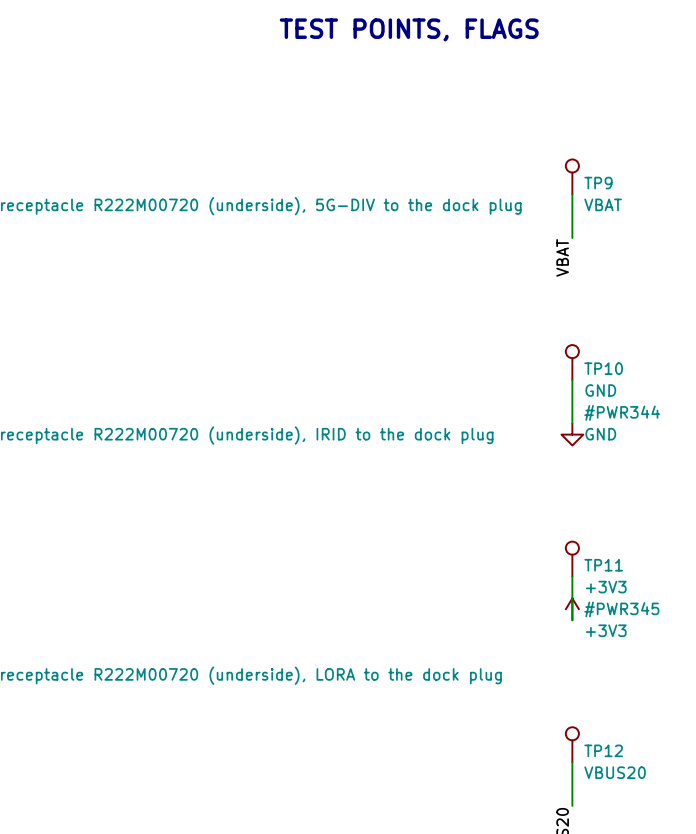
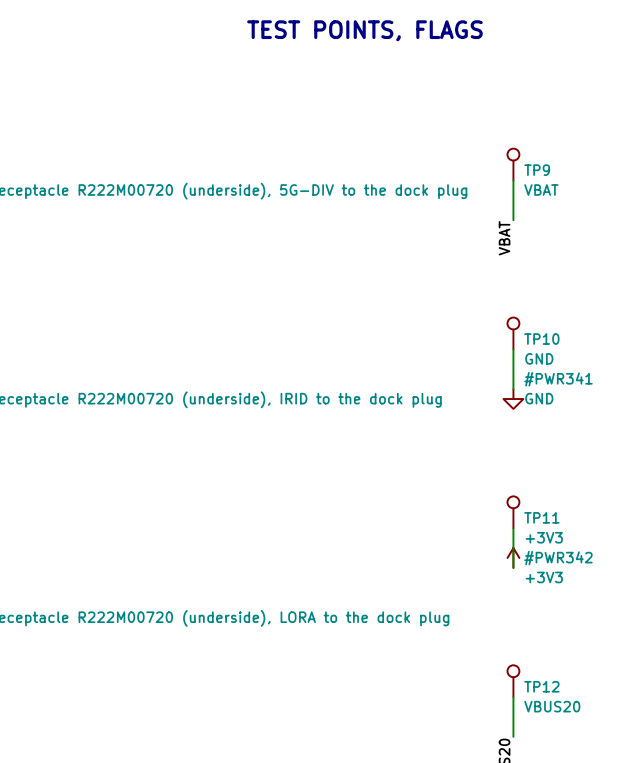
#PWR344 name: #PWR344 (622, 412) -> #PWR341 (558, 379)
#PWR345 name: #PWR345 (621, 609) -> #PWR342 (558, 558)

